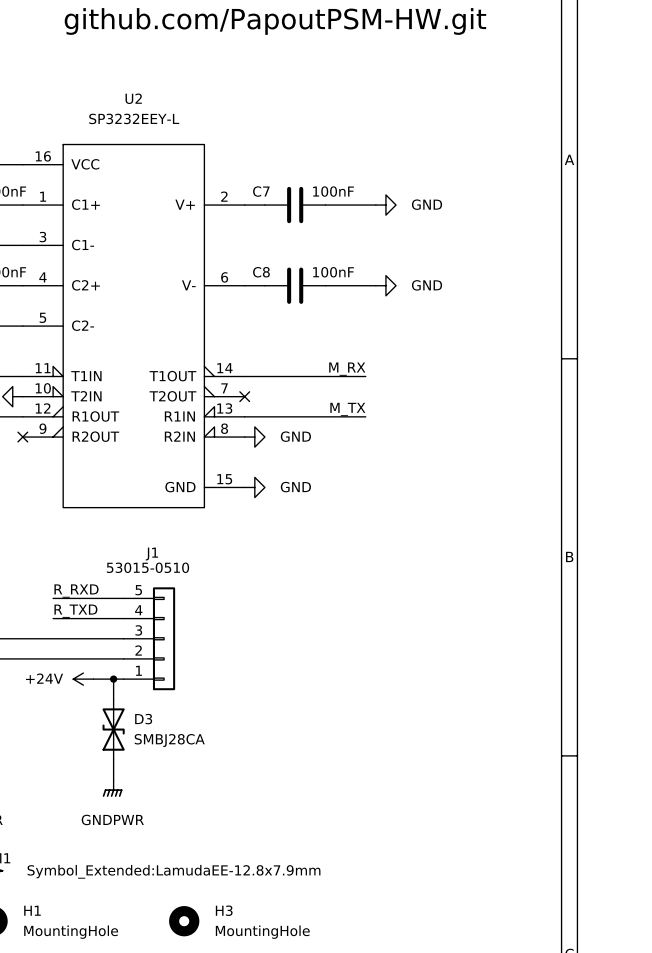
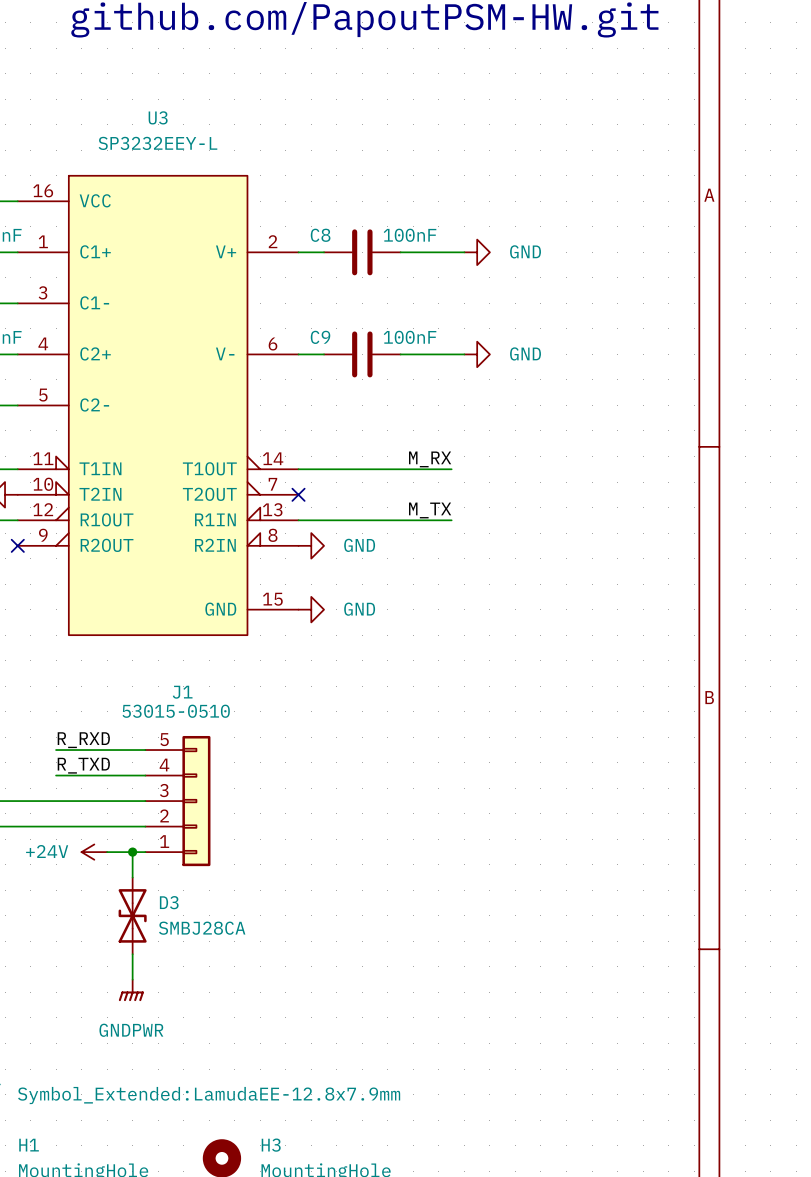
U2 name: U2 (133, 98) -> U3 (158, 117)
C7 name: C7 (261, 191) -> C8 (320, 235)
C8 name: C8 (261, 272) -> C9 (320, 337)

